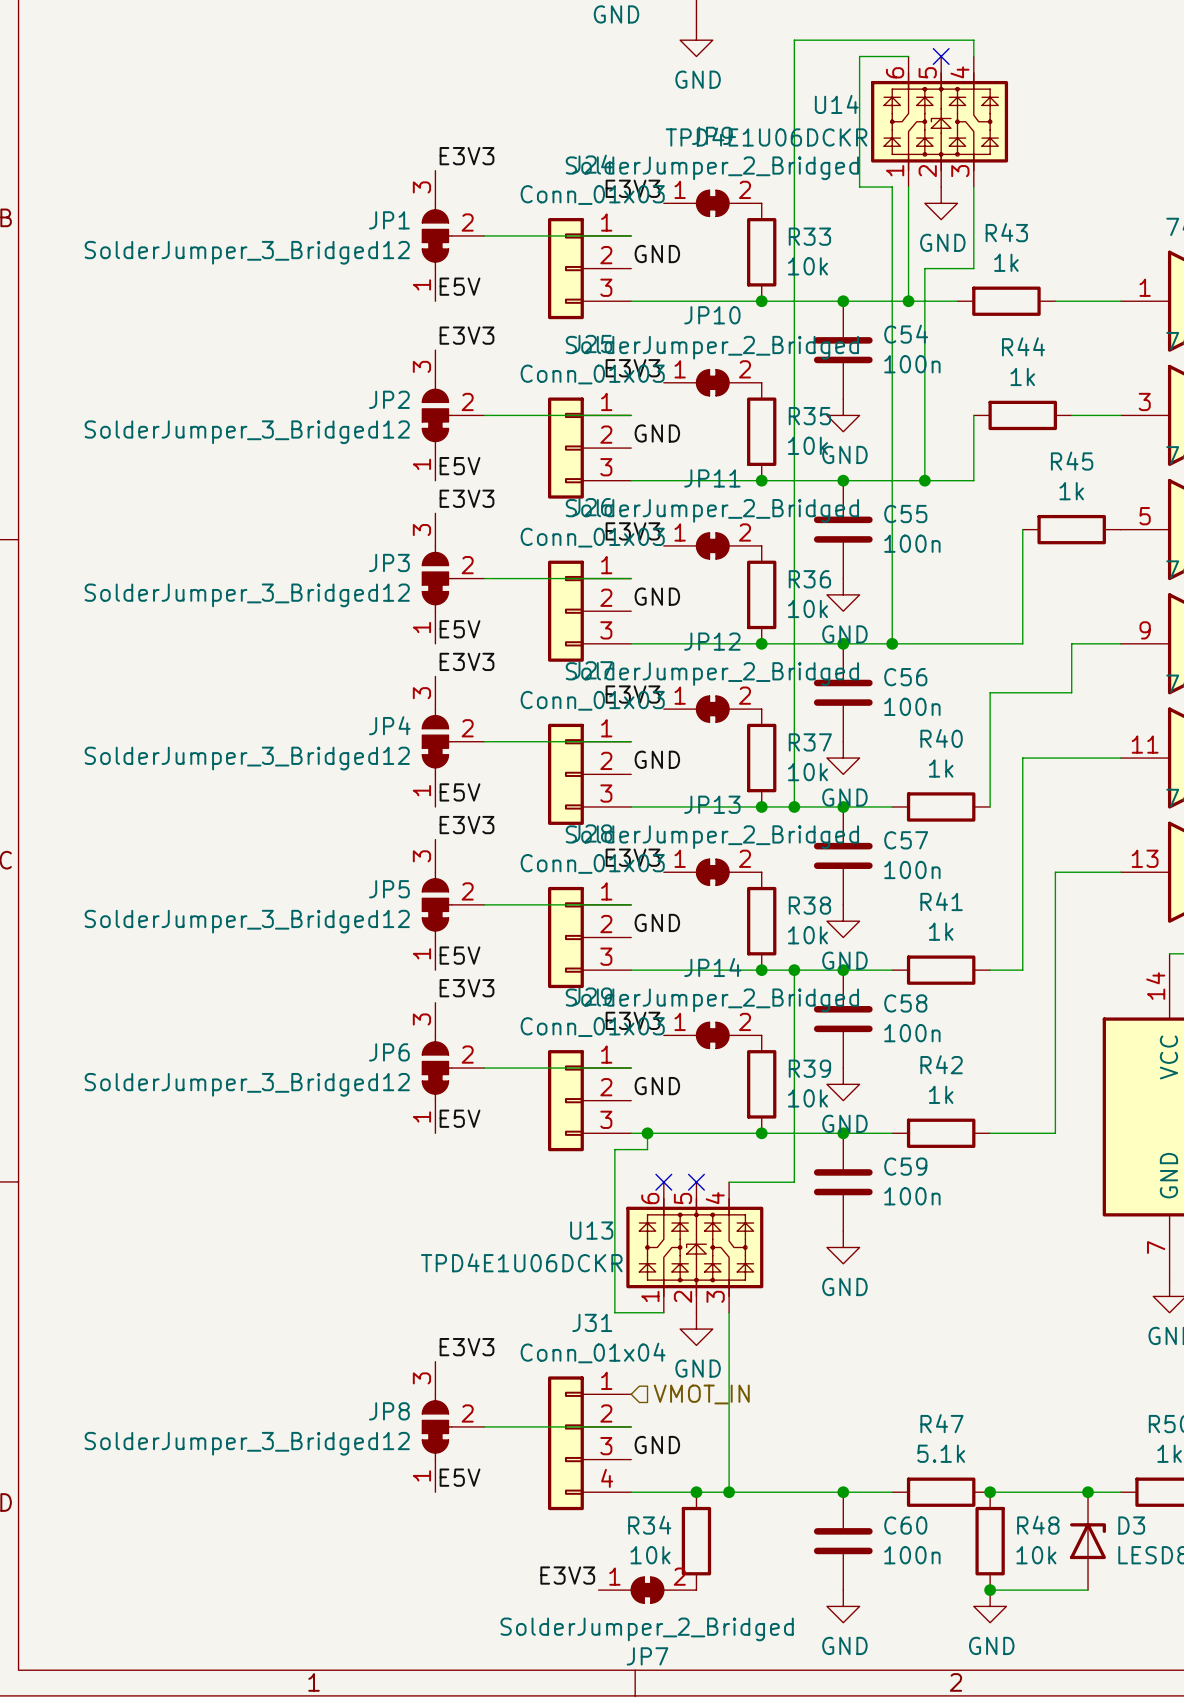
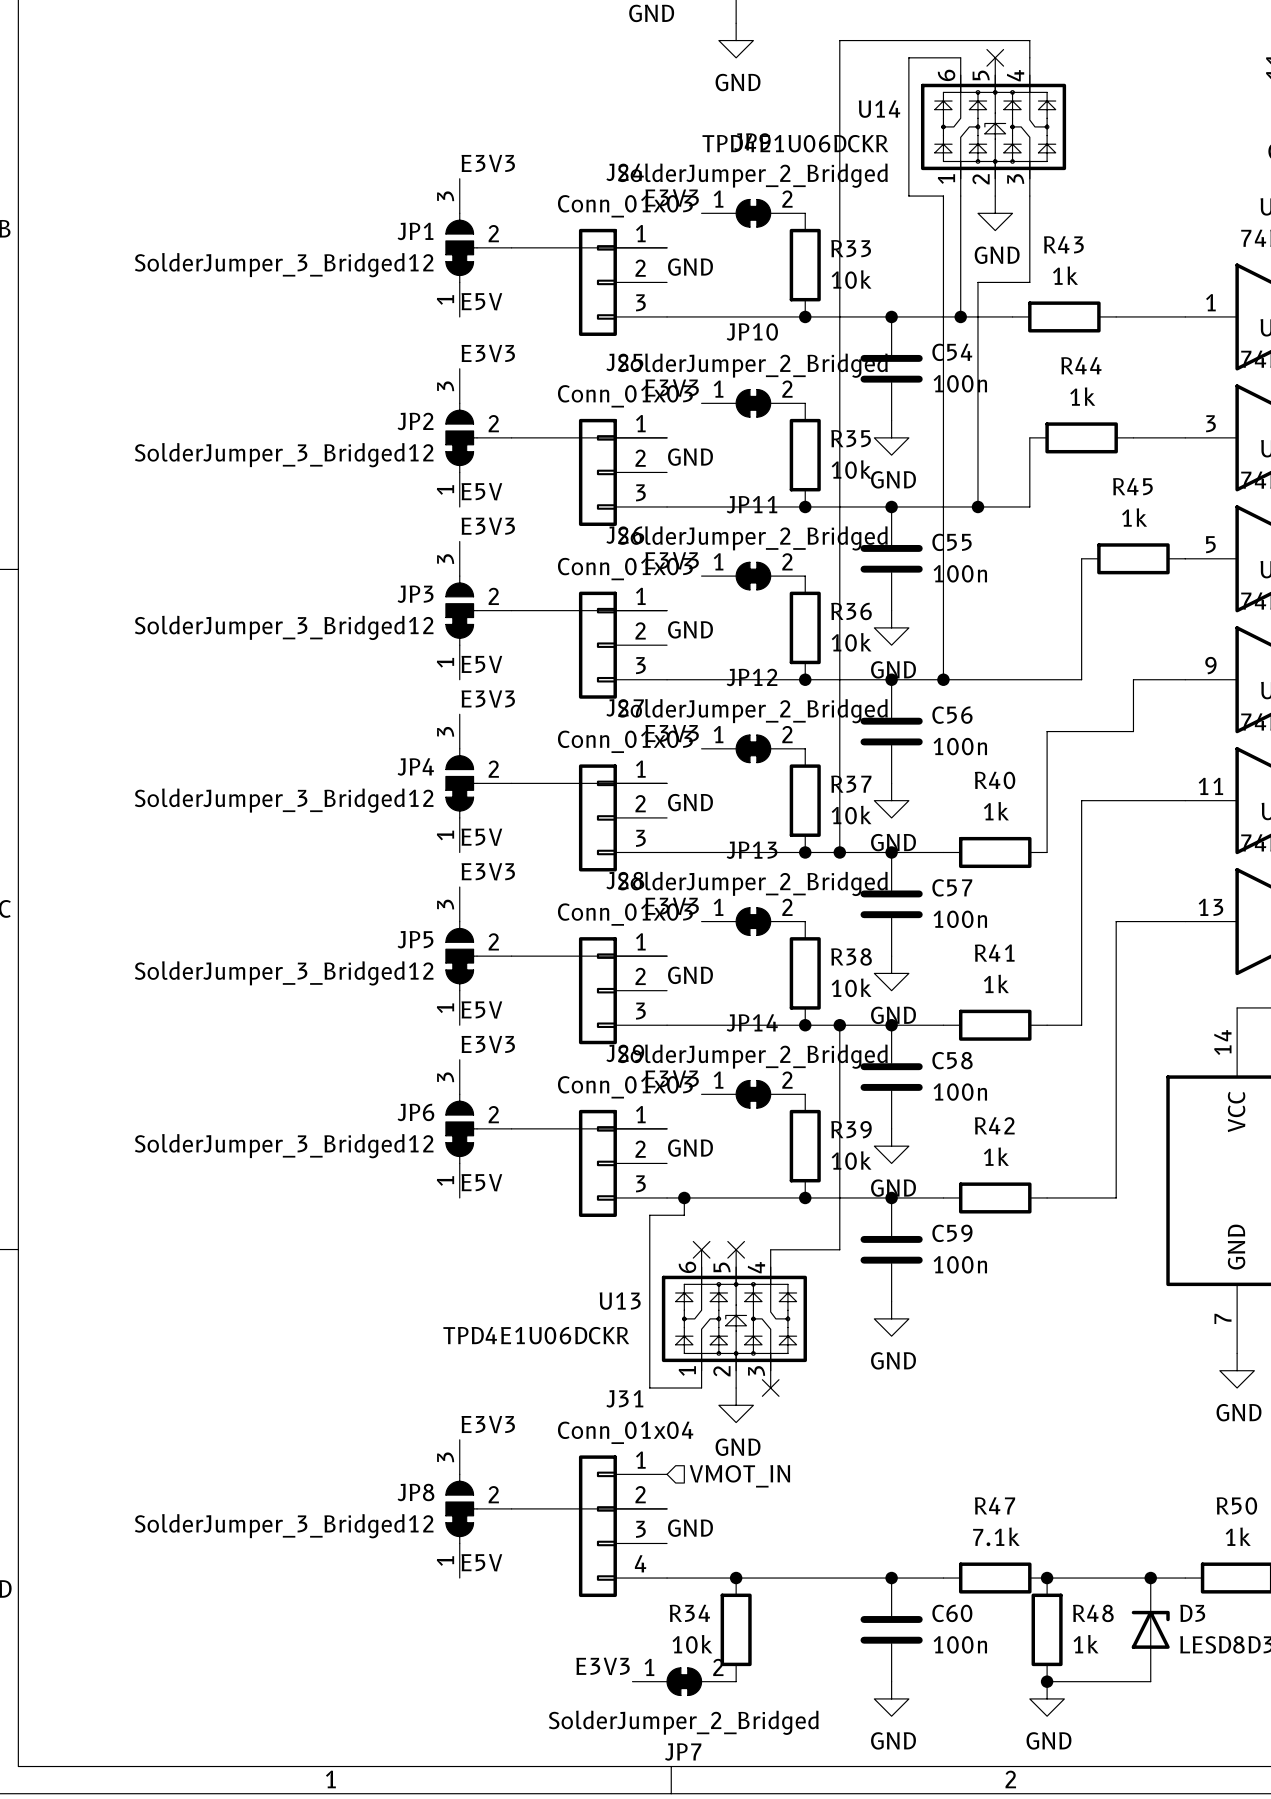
wire: (729, 1312) (729, 1492) -> none
no-connect mark: none -> (770, 1388)
R47 value: 5.1k (941, 1453) -> 7.1k (996, 1536)
junction: (729, 1492) -> none
R48 value: 10k (1036, 1555) -> 1k (1086, 1644)

